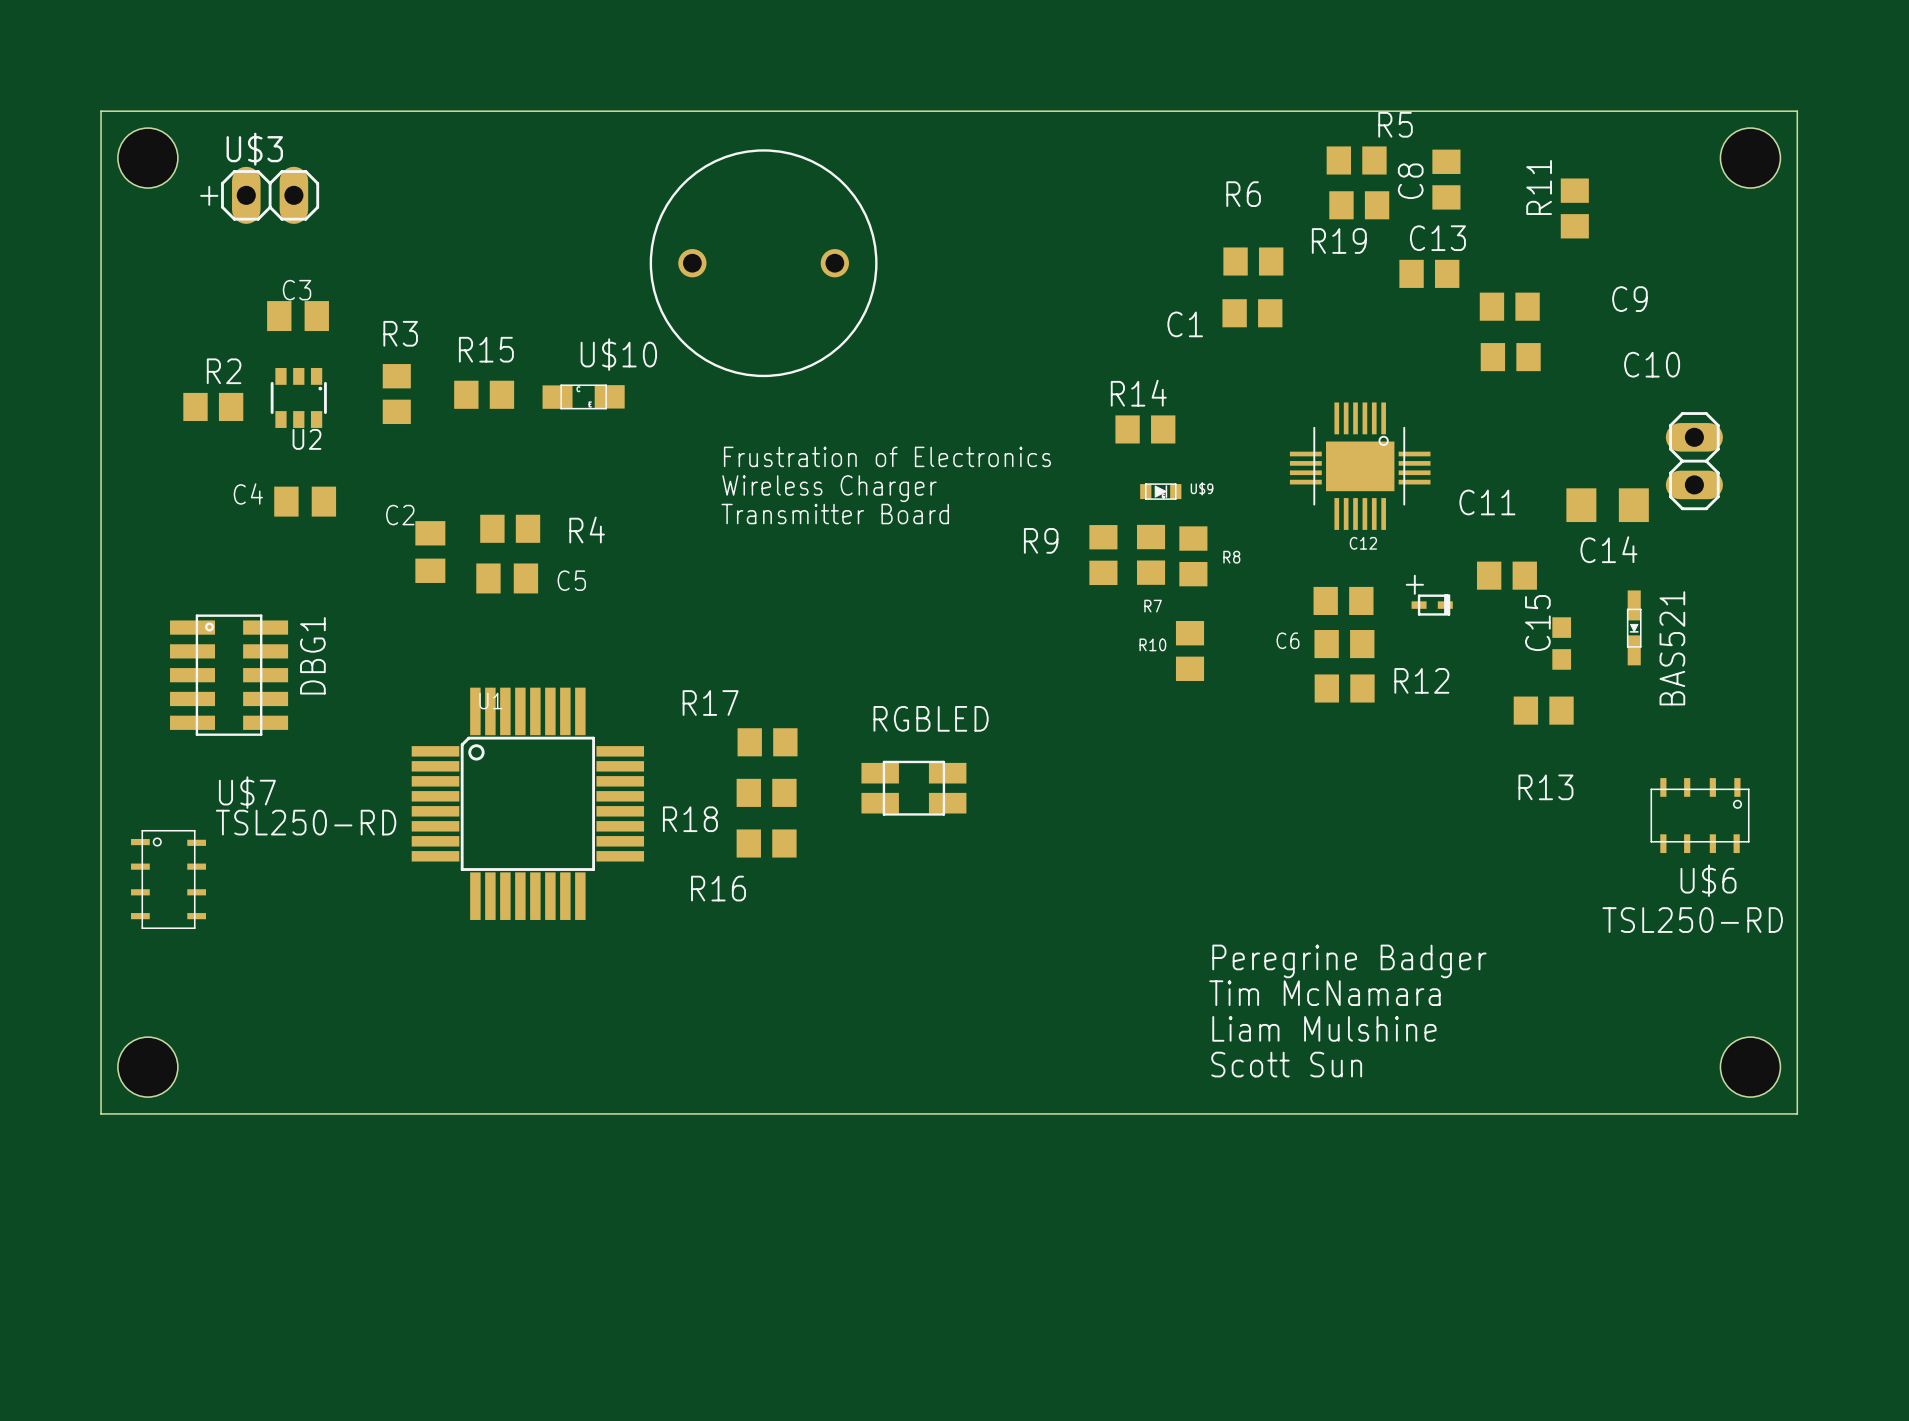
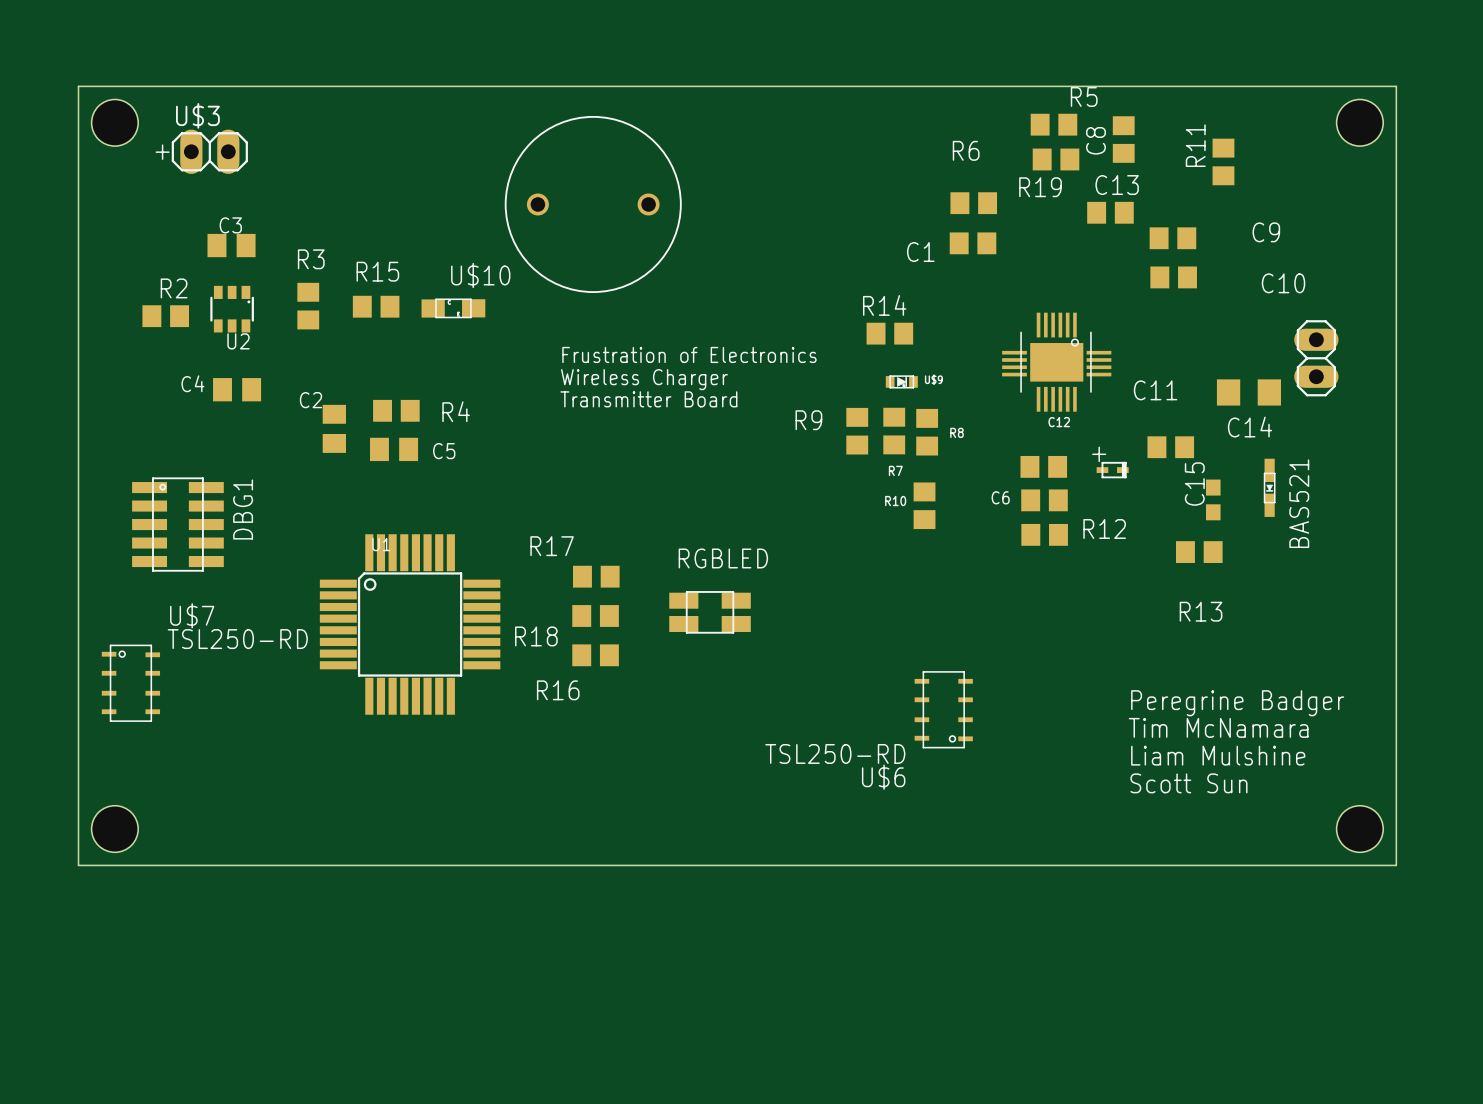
U$6 rotation: 0° (1700, 815) -> 90° clockwise (943, 709)
U$6 position: (1700, 815) -> (943, 709)
U$6 name position: U$6 (1708, 880) -> U$6 (883, 777)
U$6 value position: TSL250-RD (1692, 920) -> TSL250-RD (835, 753)
text position: Peregrine Badger (1349, 961) -> Peregrine Badger (1237, 703)
text position: Tim McNamara (1324, 993) -> Tim McNamara (1218, 727)
text position: Liam Mulshine (1324, 1028) -> Liam Mulshine (1218, 755)
text position: Scott Sun (1286, 1064) -> Scott Sun (1188, 783)

